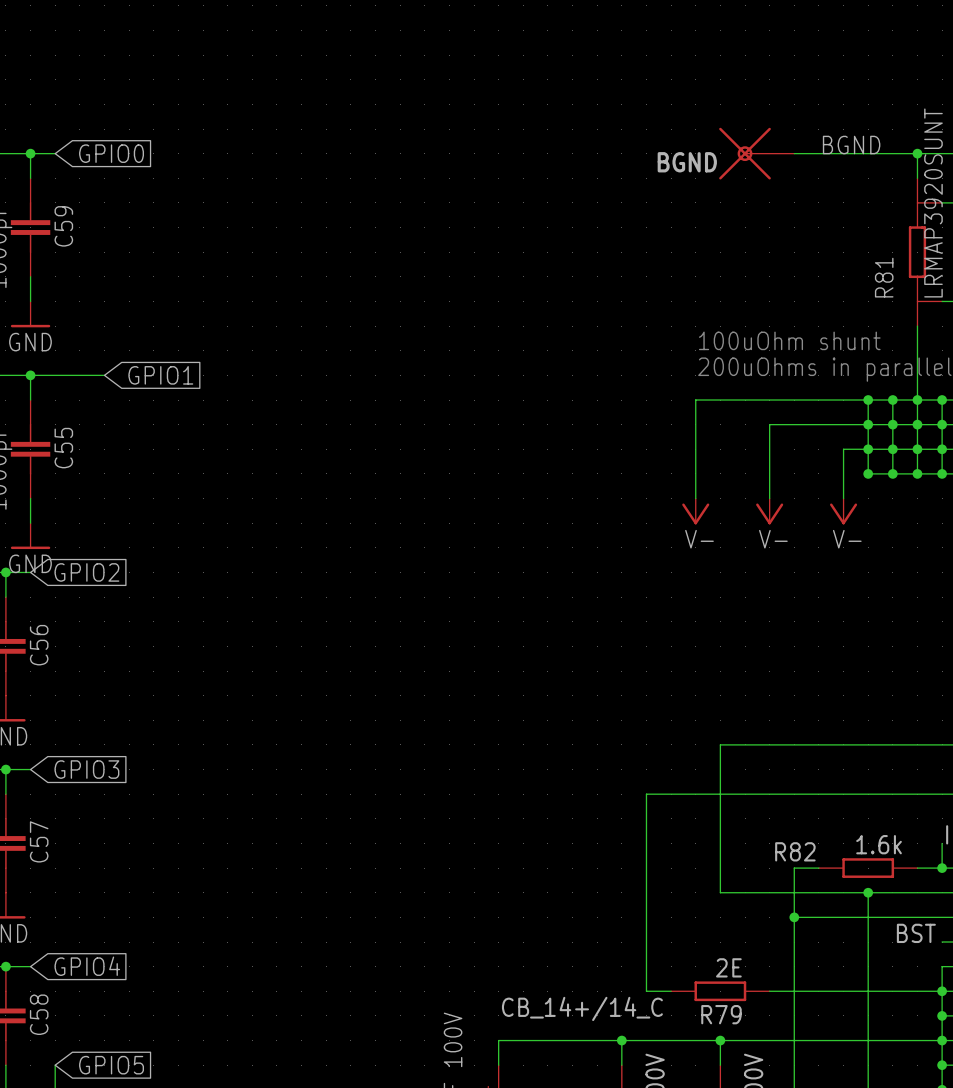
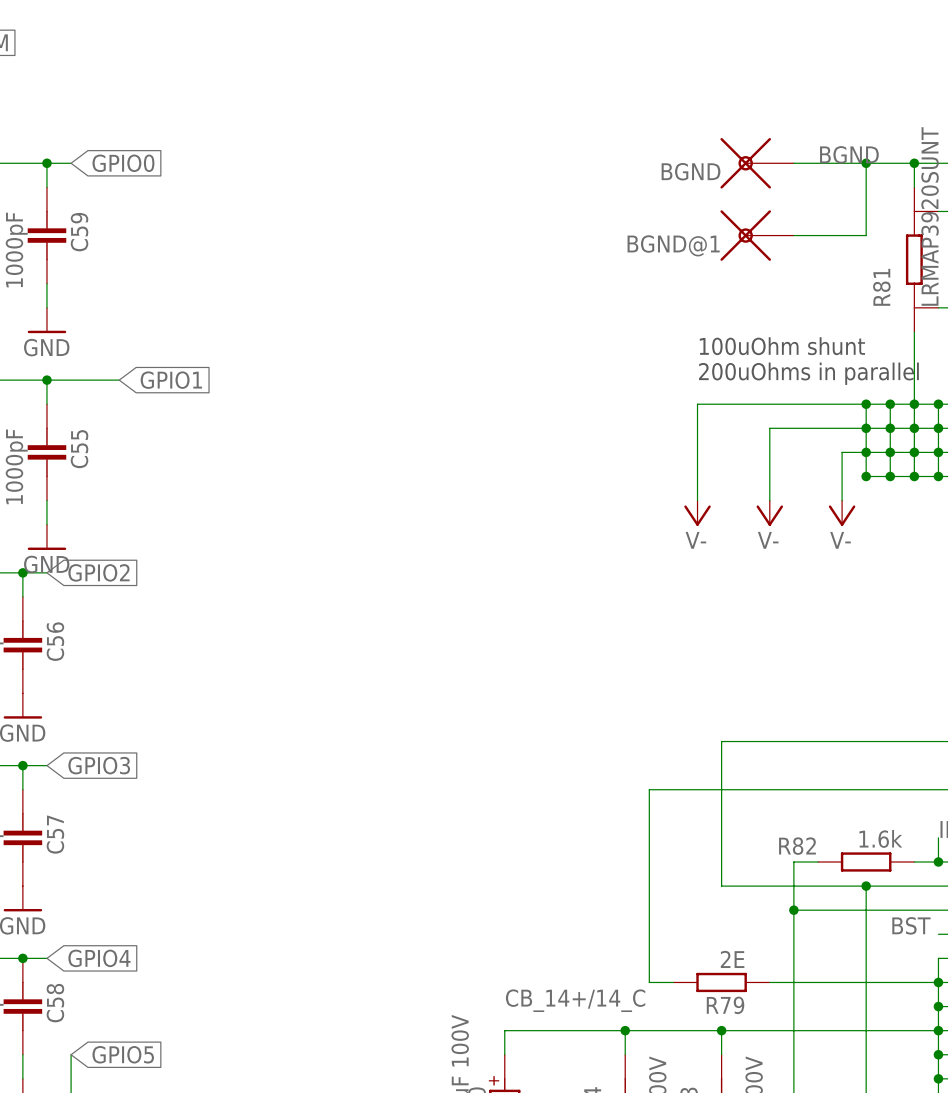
wire: none -> (866, 163) (866, 235) (793, 235)
junction: none -> (866, 163)
BGND@1: none -> (757, 235)

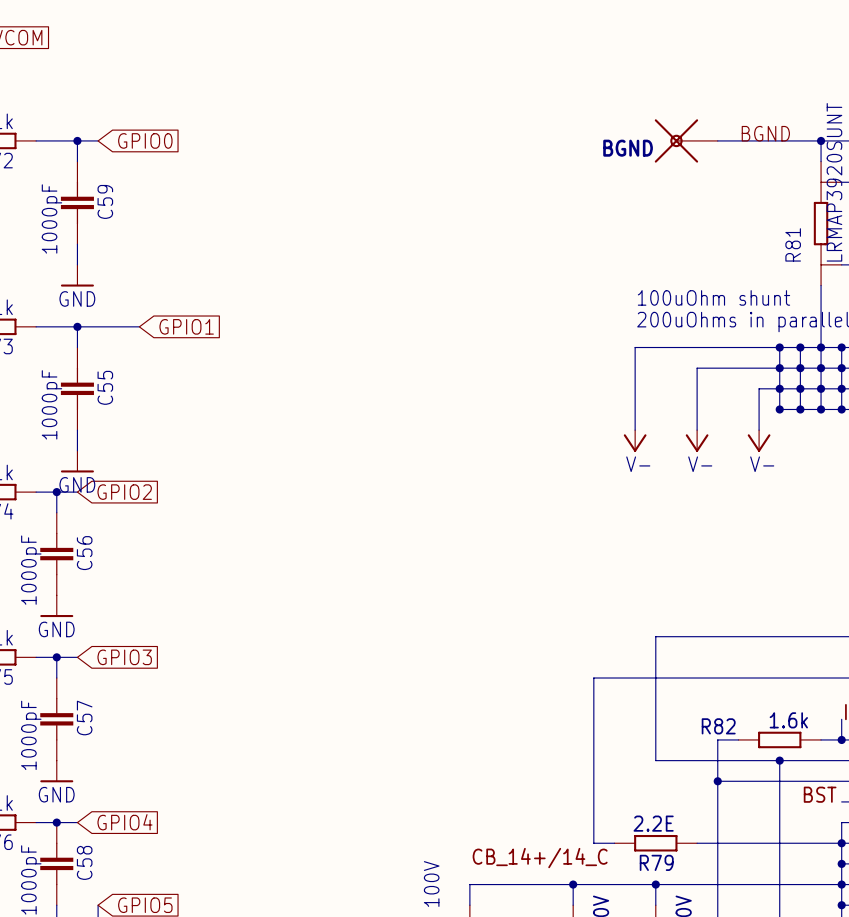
wire: (866, 163) (866, 235) (793, 235) -> none
junction: (866, 163) -> none
BGND@1: (757, 235) -> none
R79 value: 2E (732, 959) -> 2.2E (653, 823)

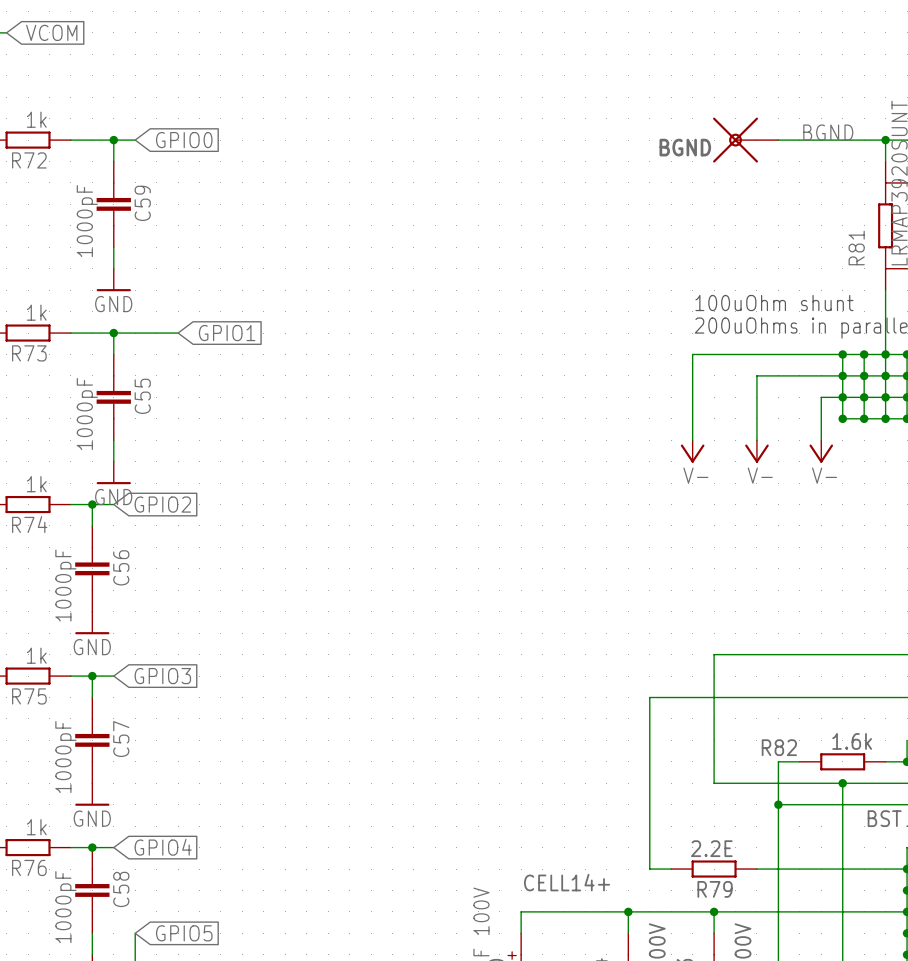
label: CB_14+/14_C (540, 858) -> CELL14+ (567, 882)

